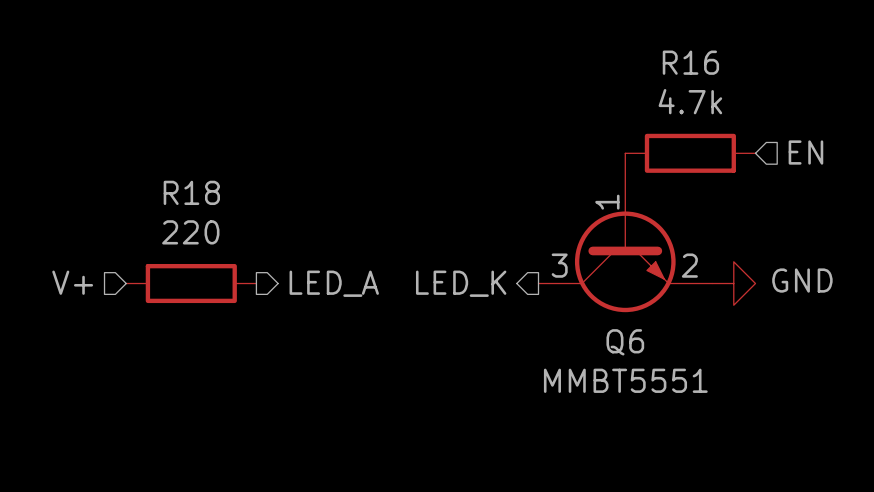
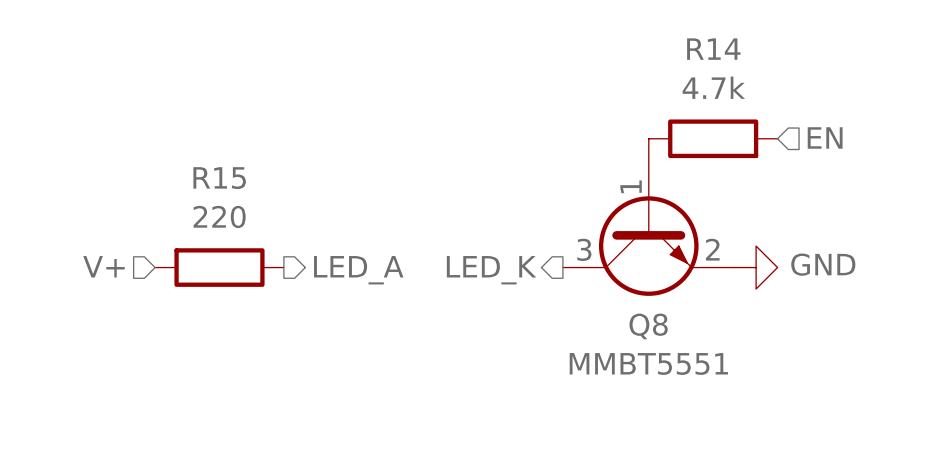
R16 name: R16 (690, 62) -> R14 (713, 49)
R18 name: R18 (191, 192) -> R15 (219, 178)
Q6 name: Q6 (625, 342) -> Q8 (648, 326)

